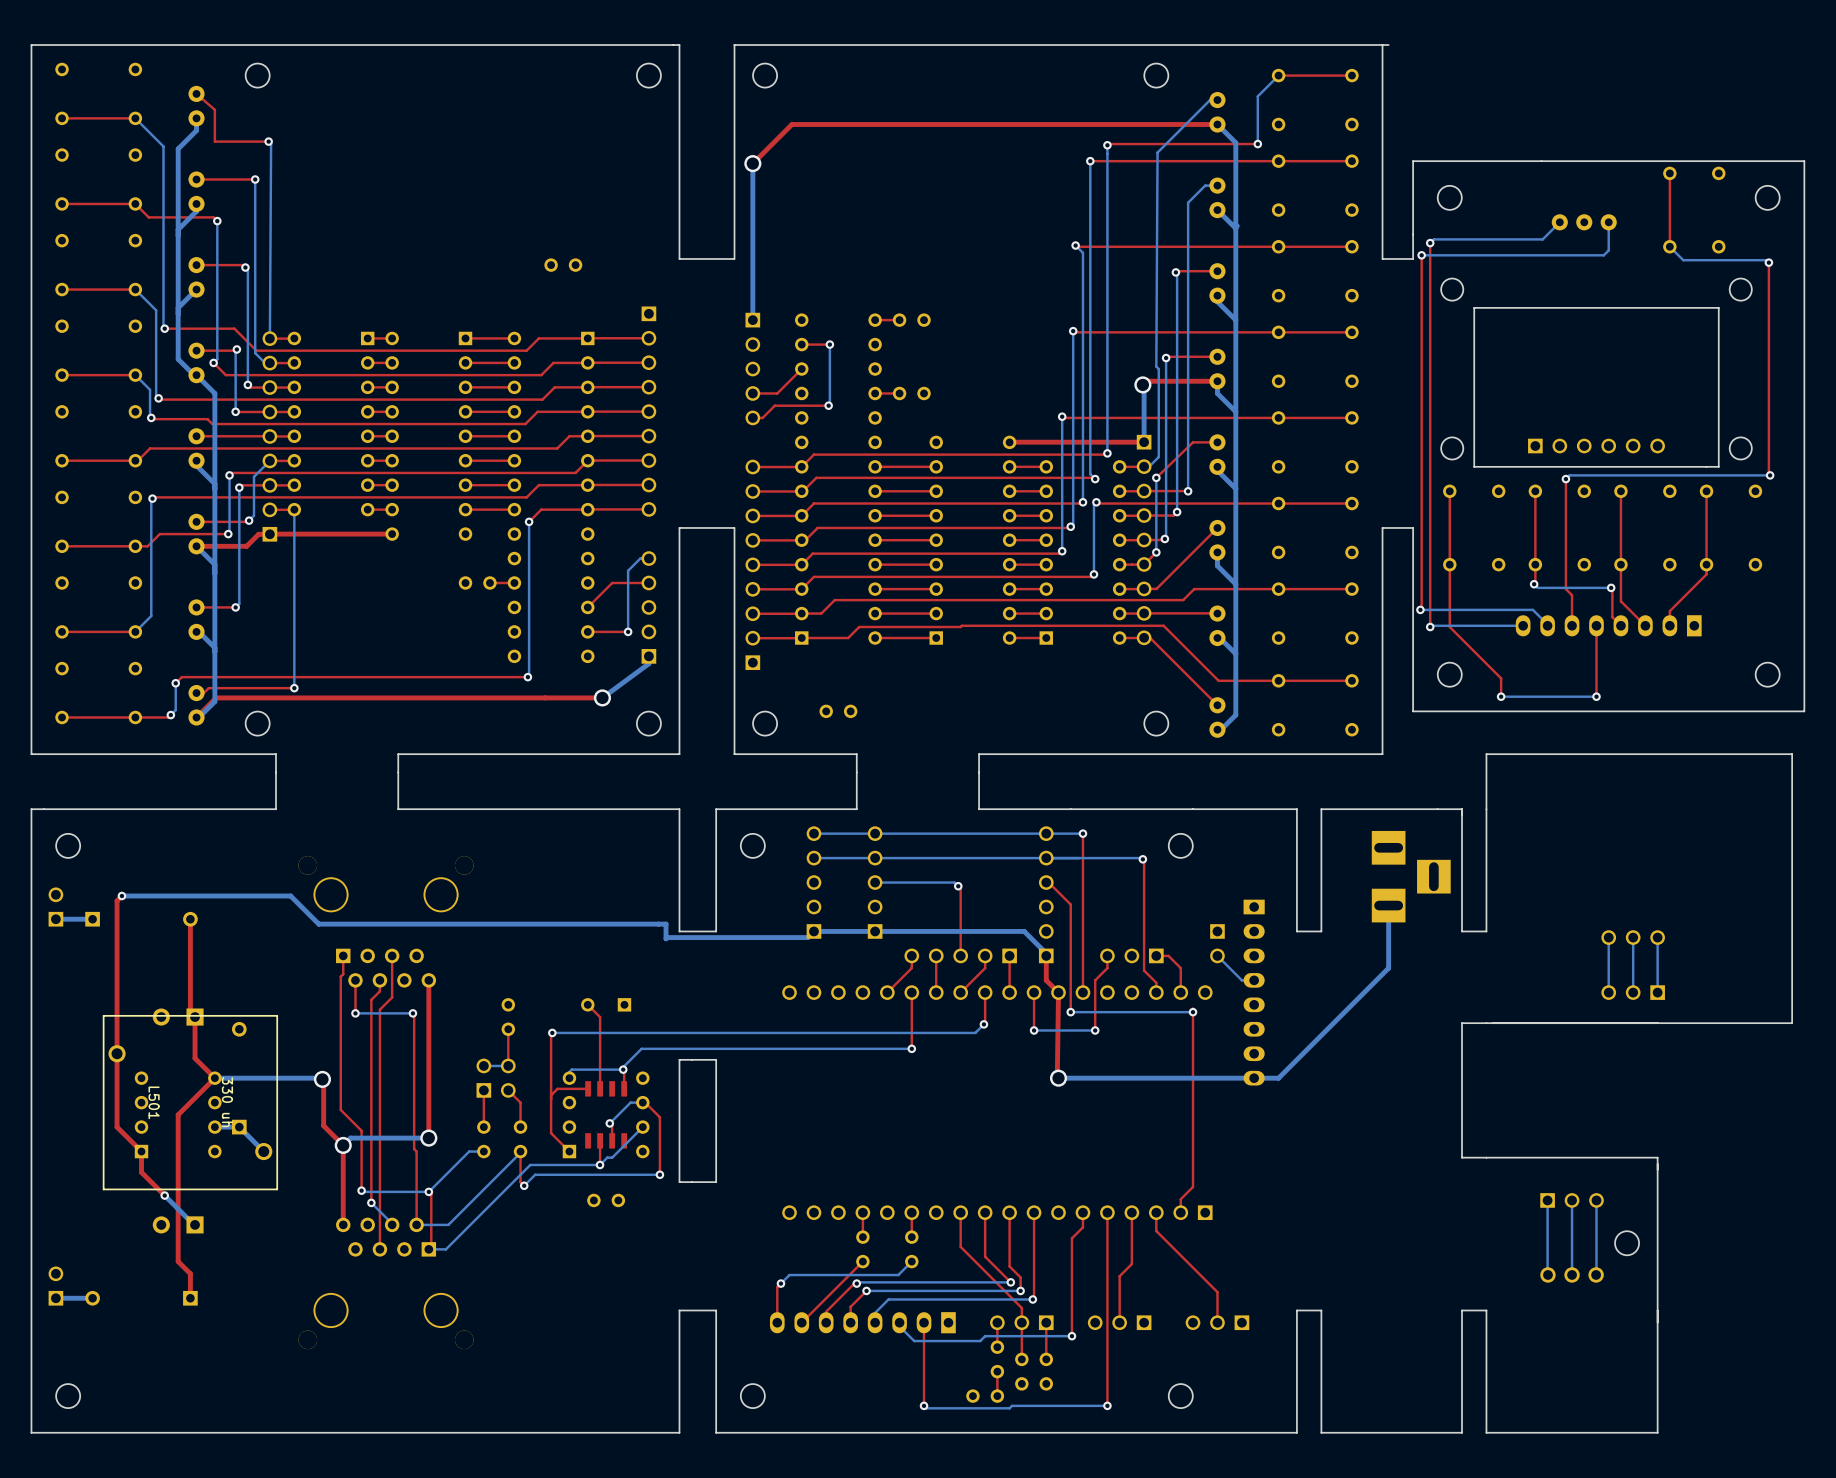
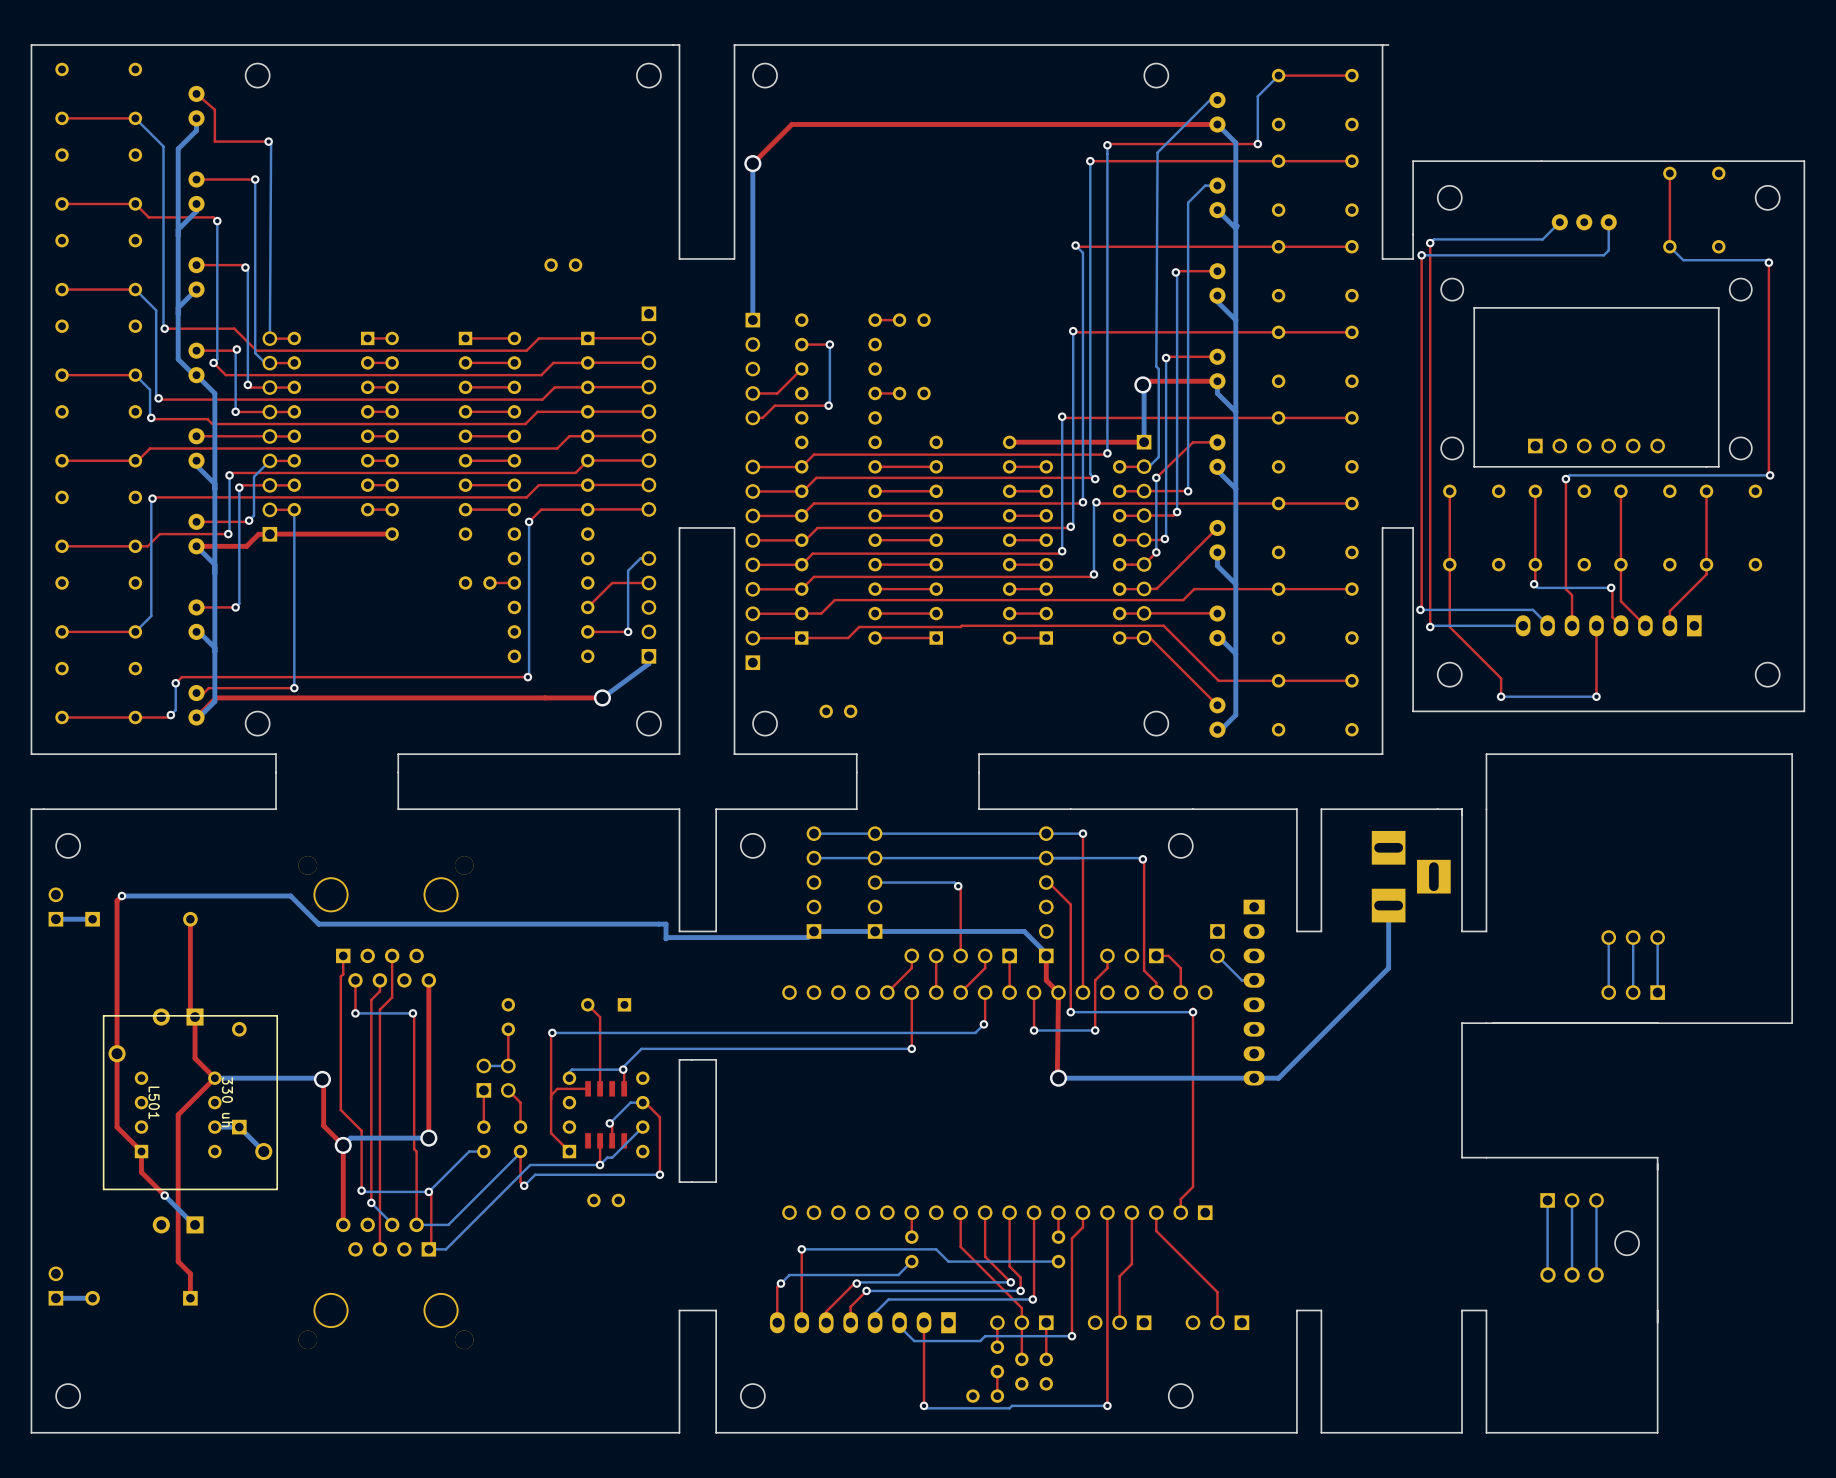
top track: (862, 1212) (862, 1237) -> (1058, 1212) (1058, 1237)
bottom track: none -> (801, 1249) (936, 1249) (948, 1261) (1058, 1261)
via: none -> (801, 1249)
part position: (862, 1249) -> (1058, 1249)
top track: (862, 1261) (801, 1322) -> (801, 1249) (801, 1322)

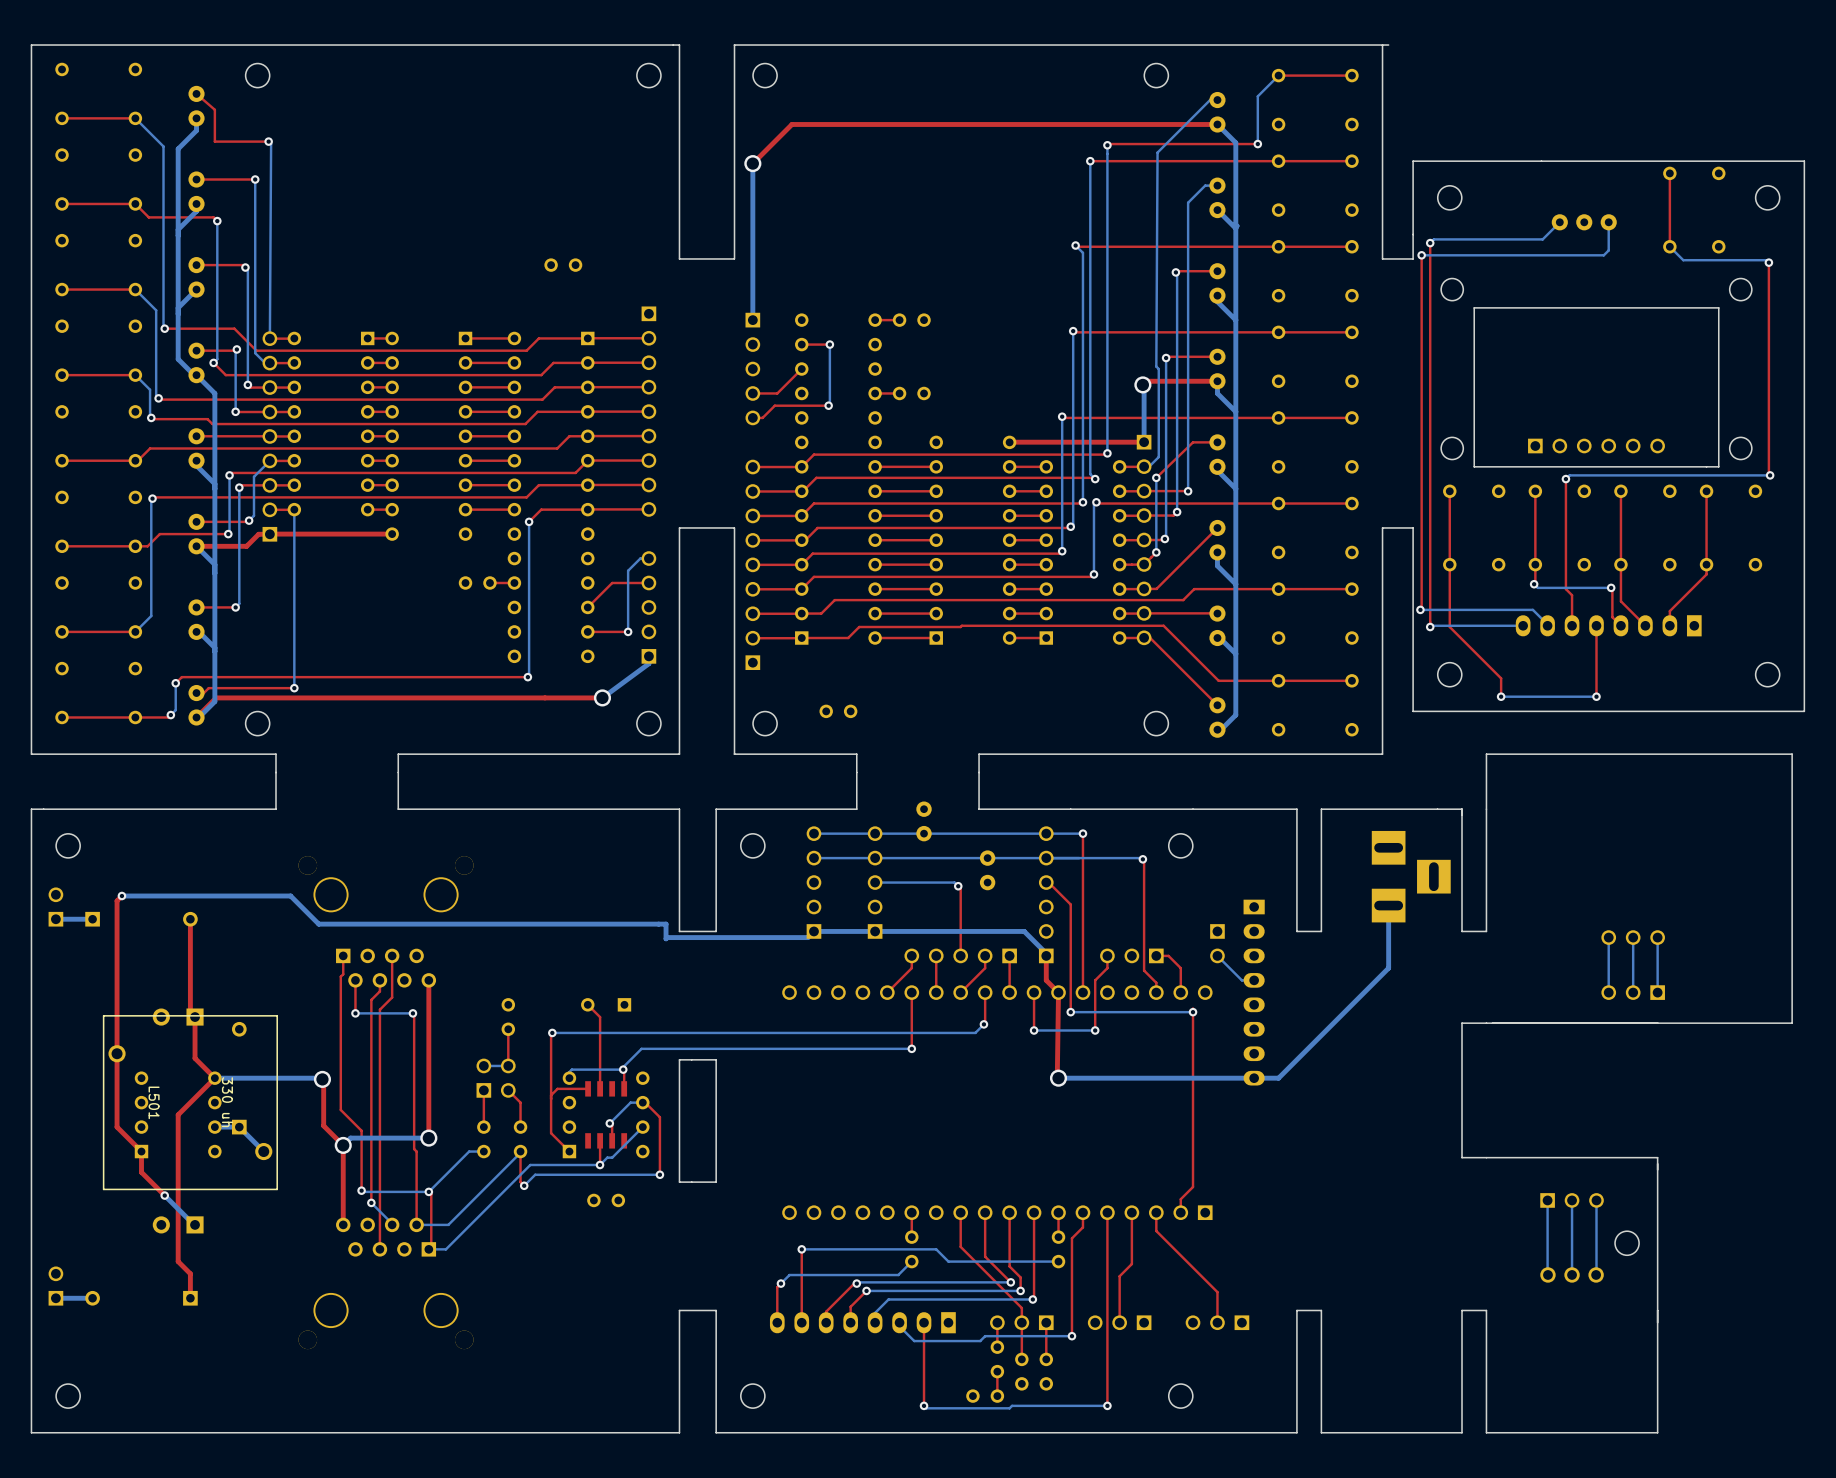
part: none -> (924, 821)
part: none -> (987, 870)

